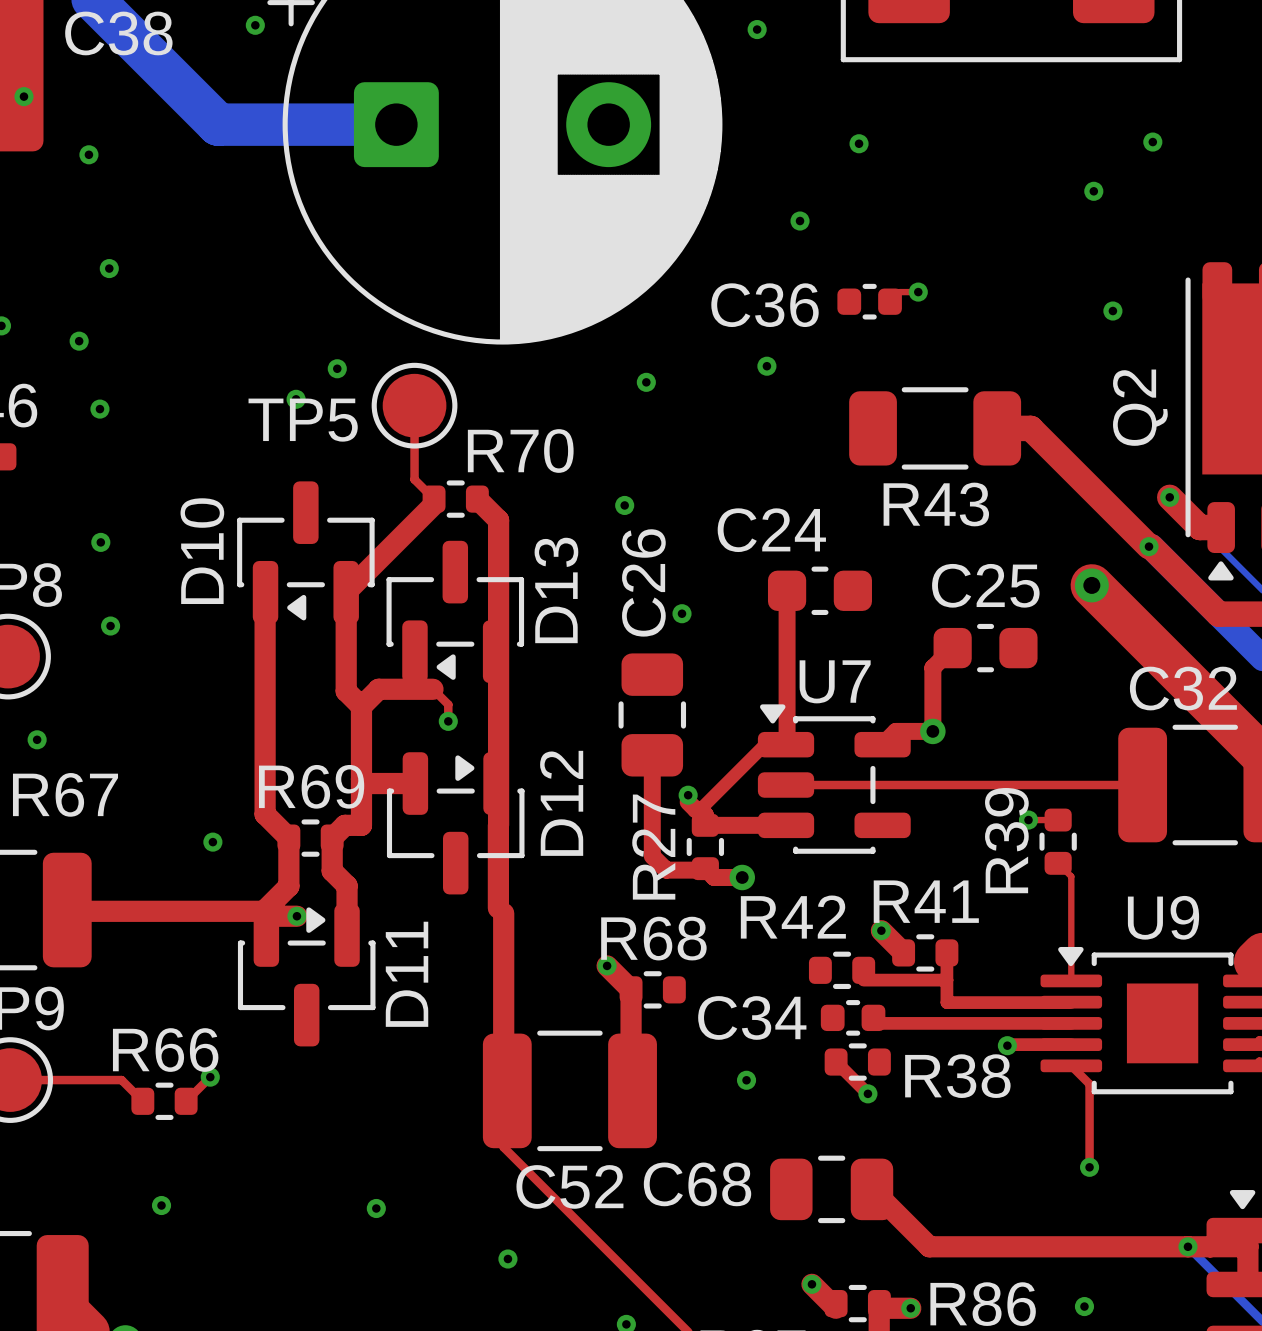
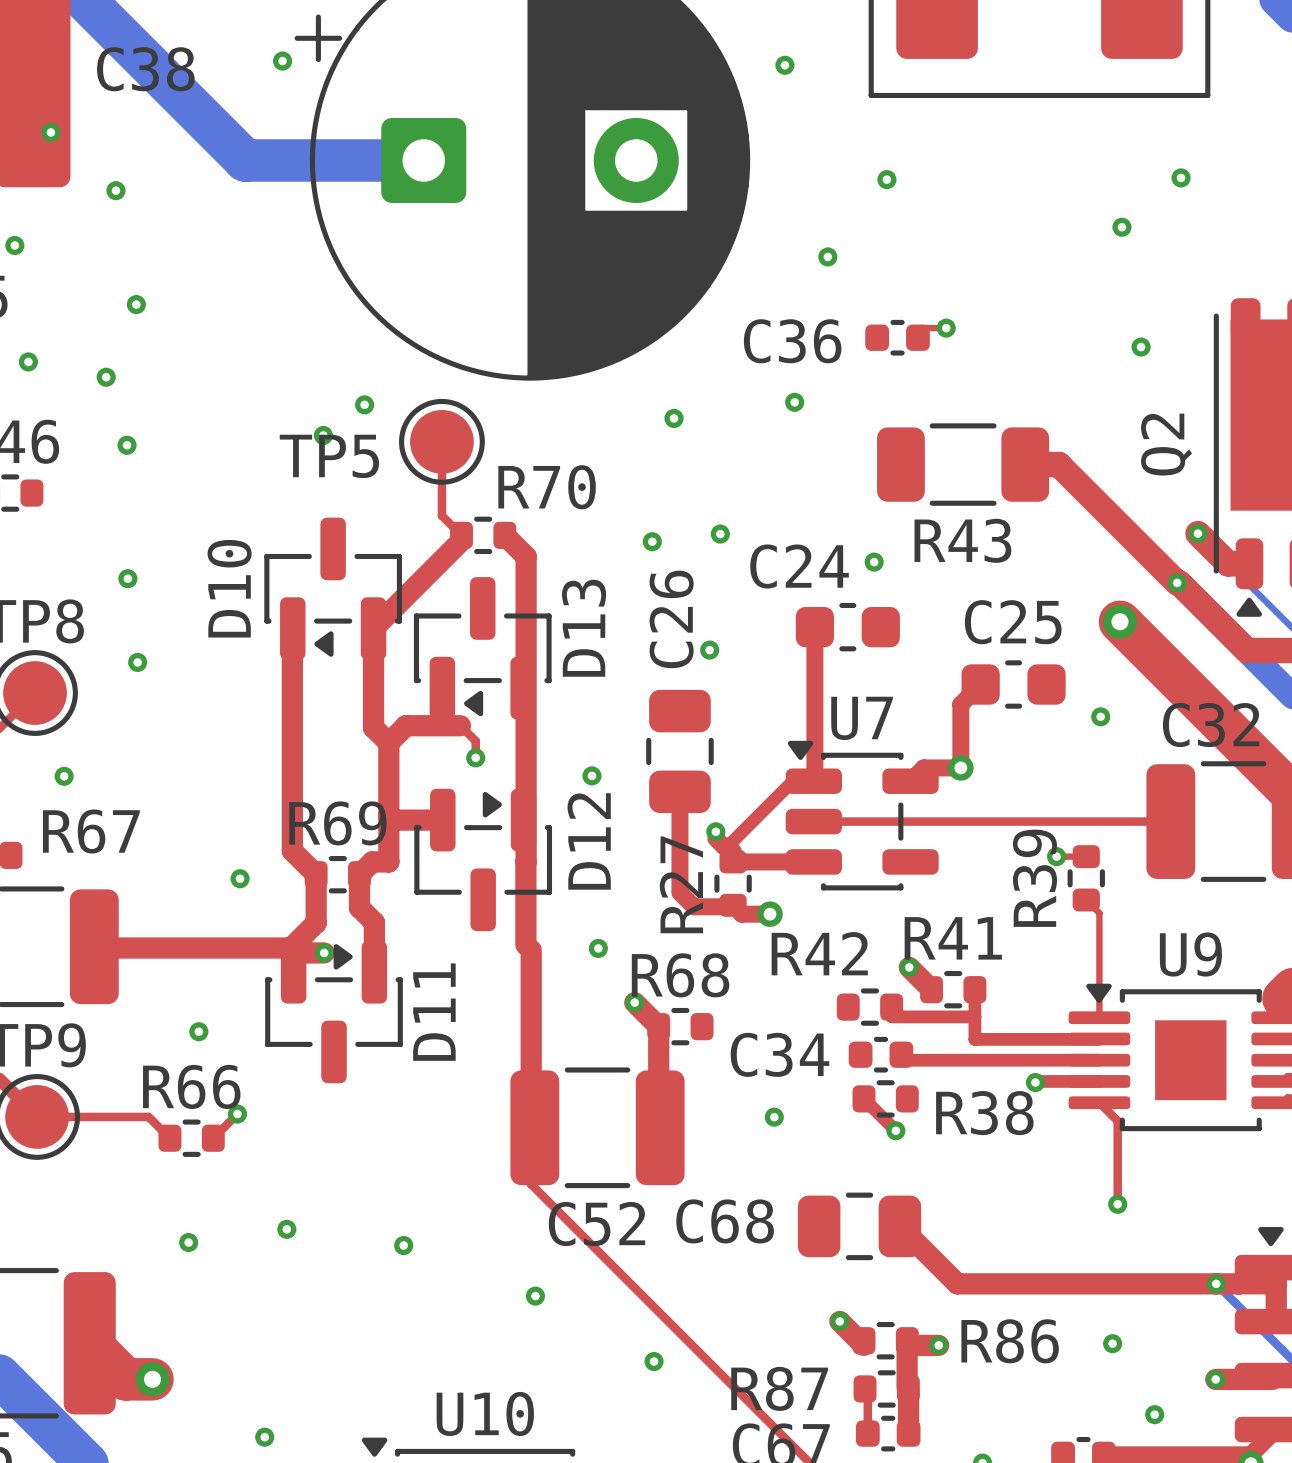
via: none -> (720, 534)
via: none -> (874, 562)
via: none -> (1100, 716)
via: none -> (591, 775)
via: none -> (598, 948)
via: none -> (198, 1031)
via: none -> (286, 1229)

